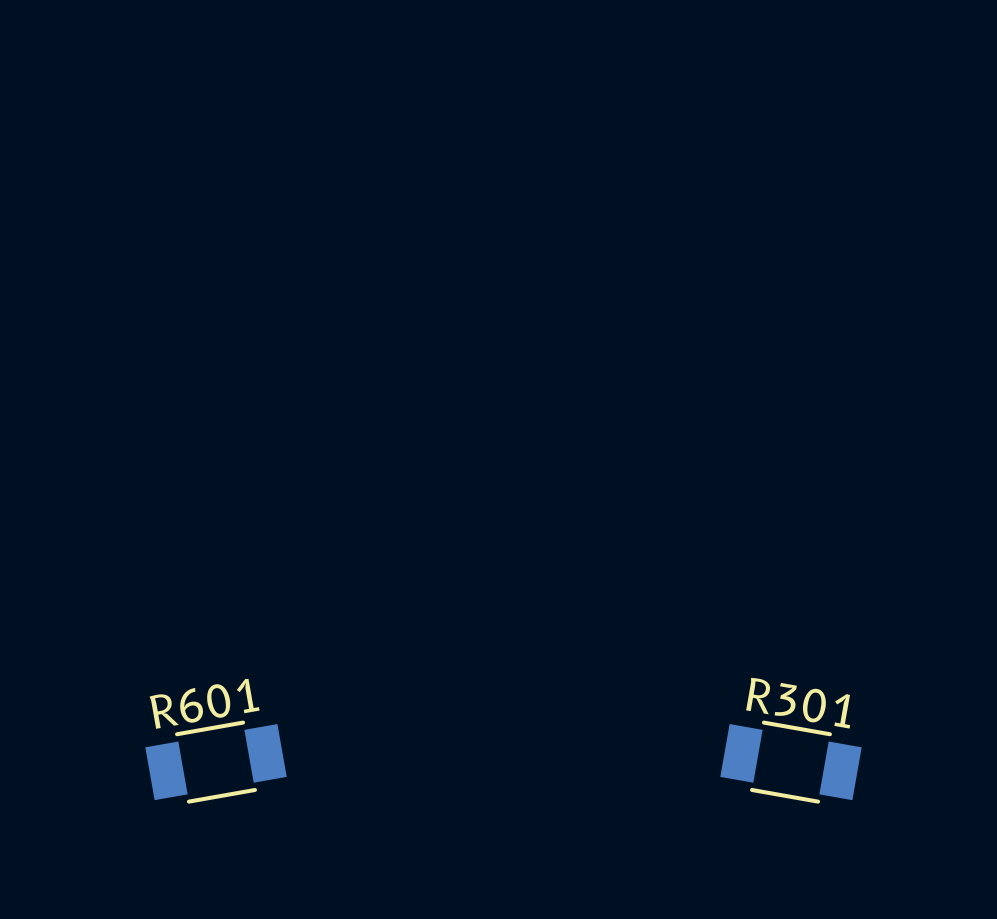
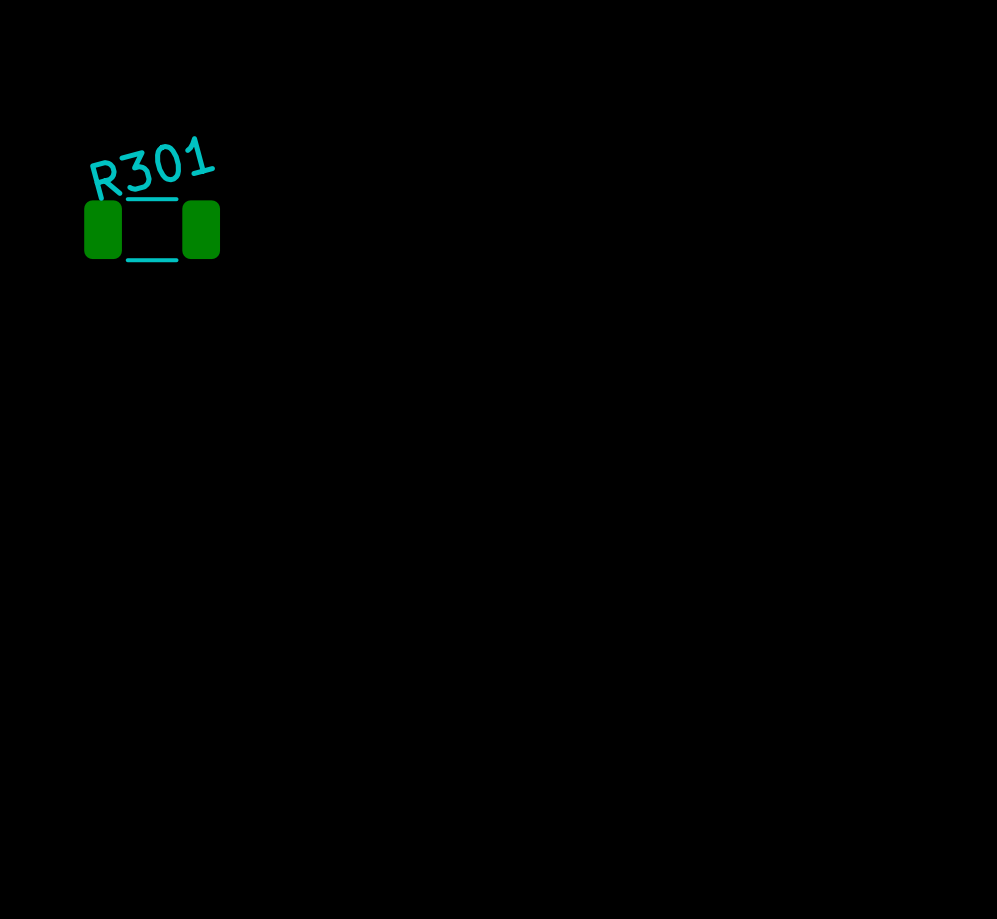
R301 footprint: [720, 720, 862, 804] -> [84, 197, 221, 263]
R601: (216, 762) -> none

